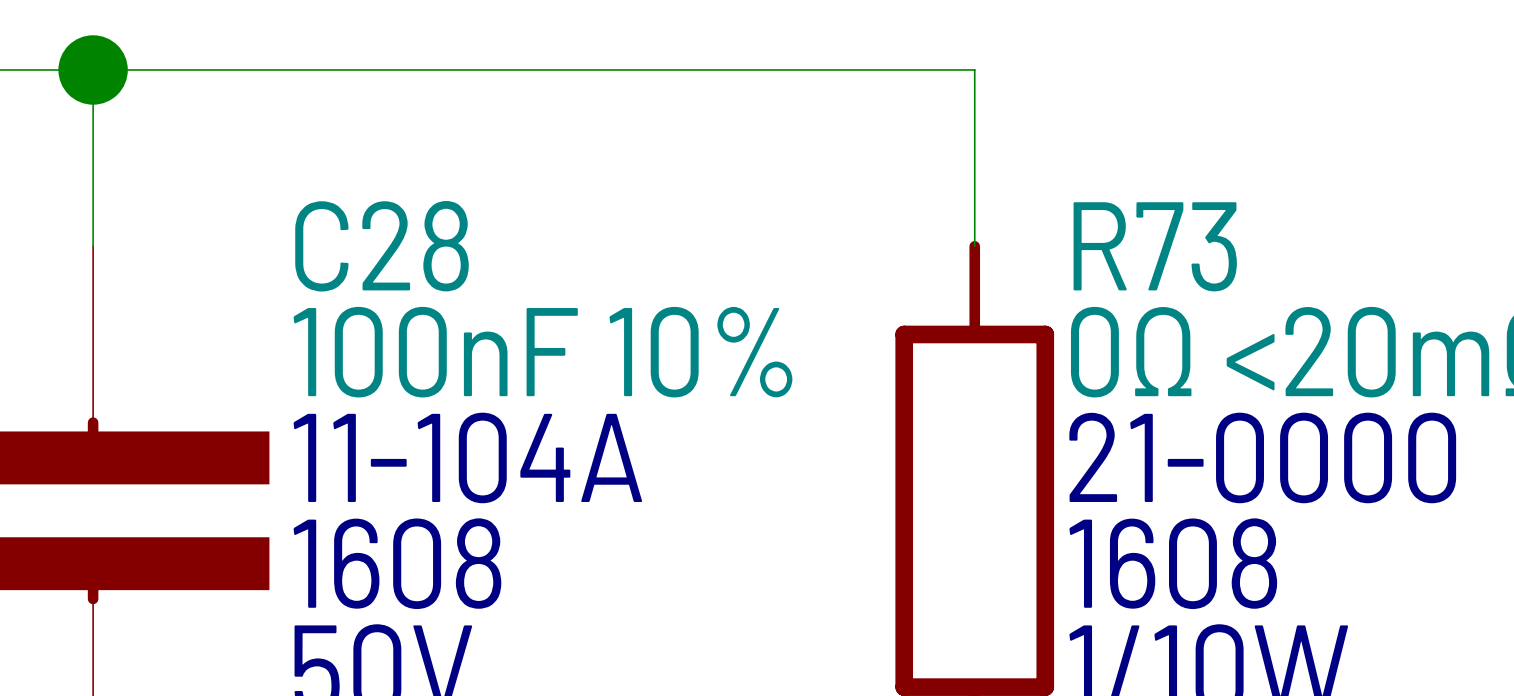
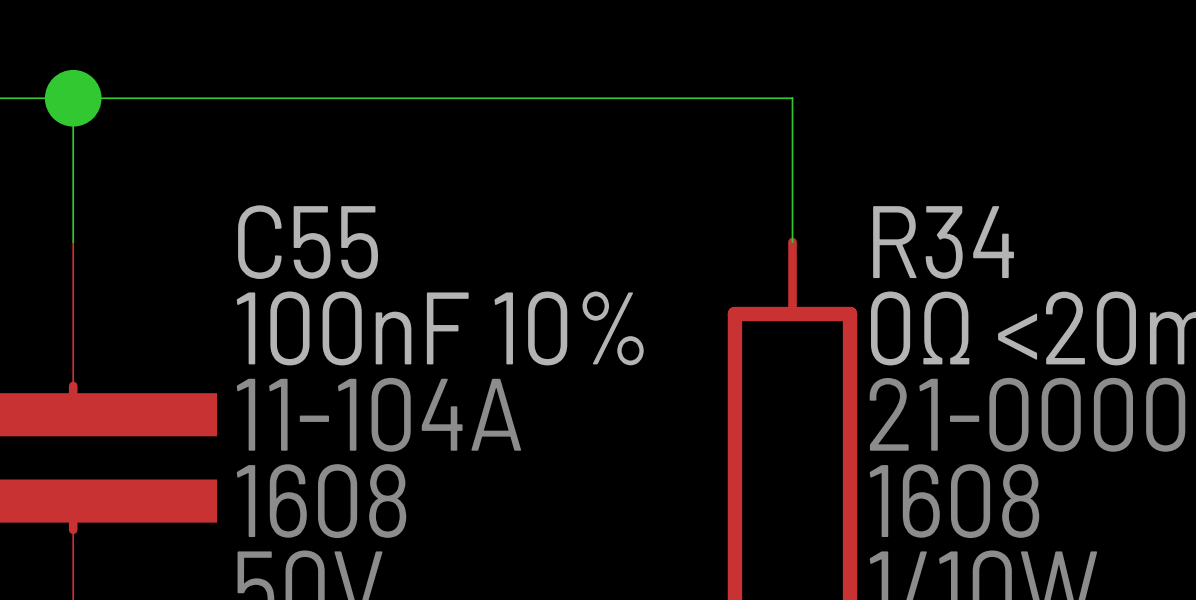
C28 name: C28 (382, 246) -> C55 (308, 242)
R73 name: R73 (1155, 246) -> R34 (943, 242)

